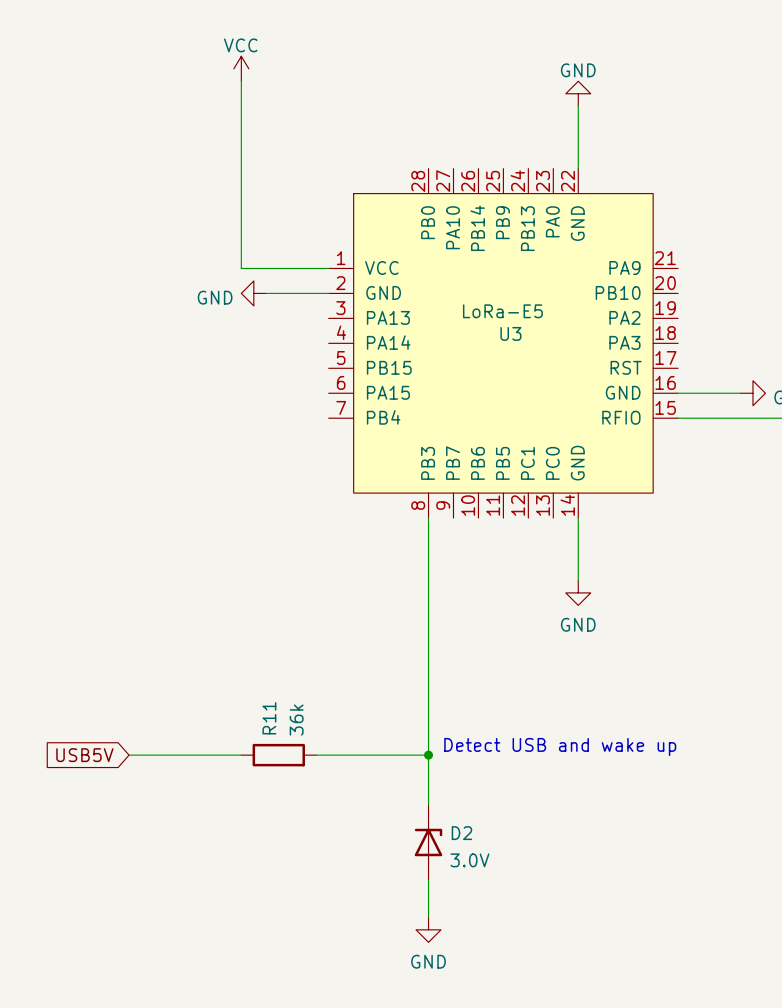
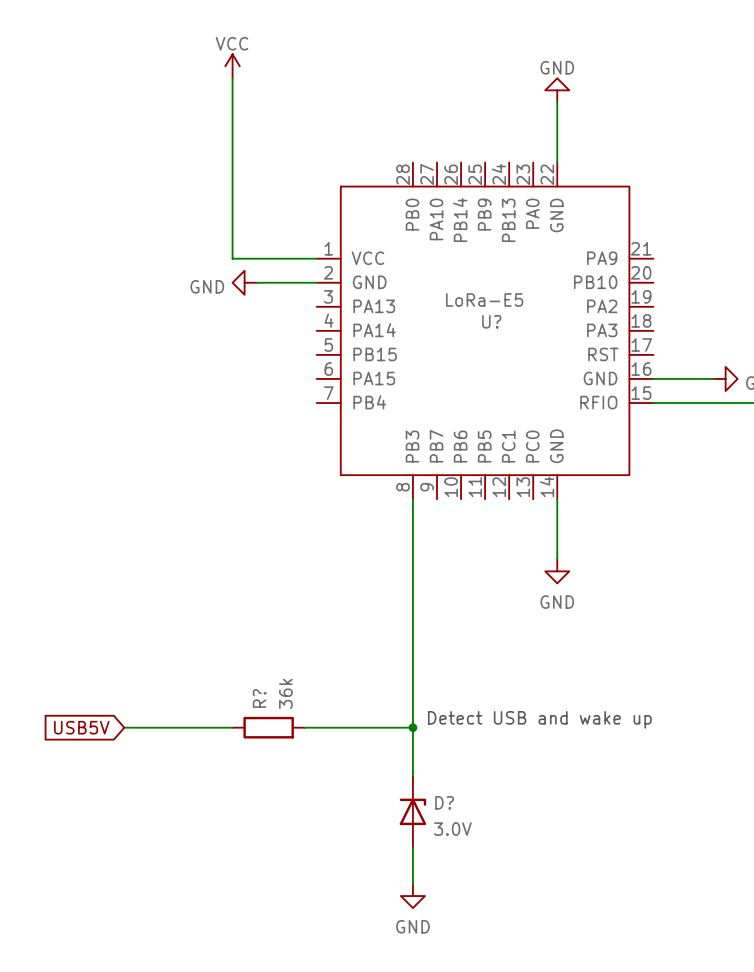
U3 name: U3 (510, 333) -> U? (491, 321)
R11 name: R11 (269, 718) -> R? (259, 698)
D2 name: D2 (461, 833) -> D? (444, 802)

